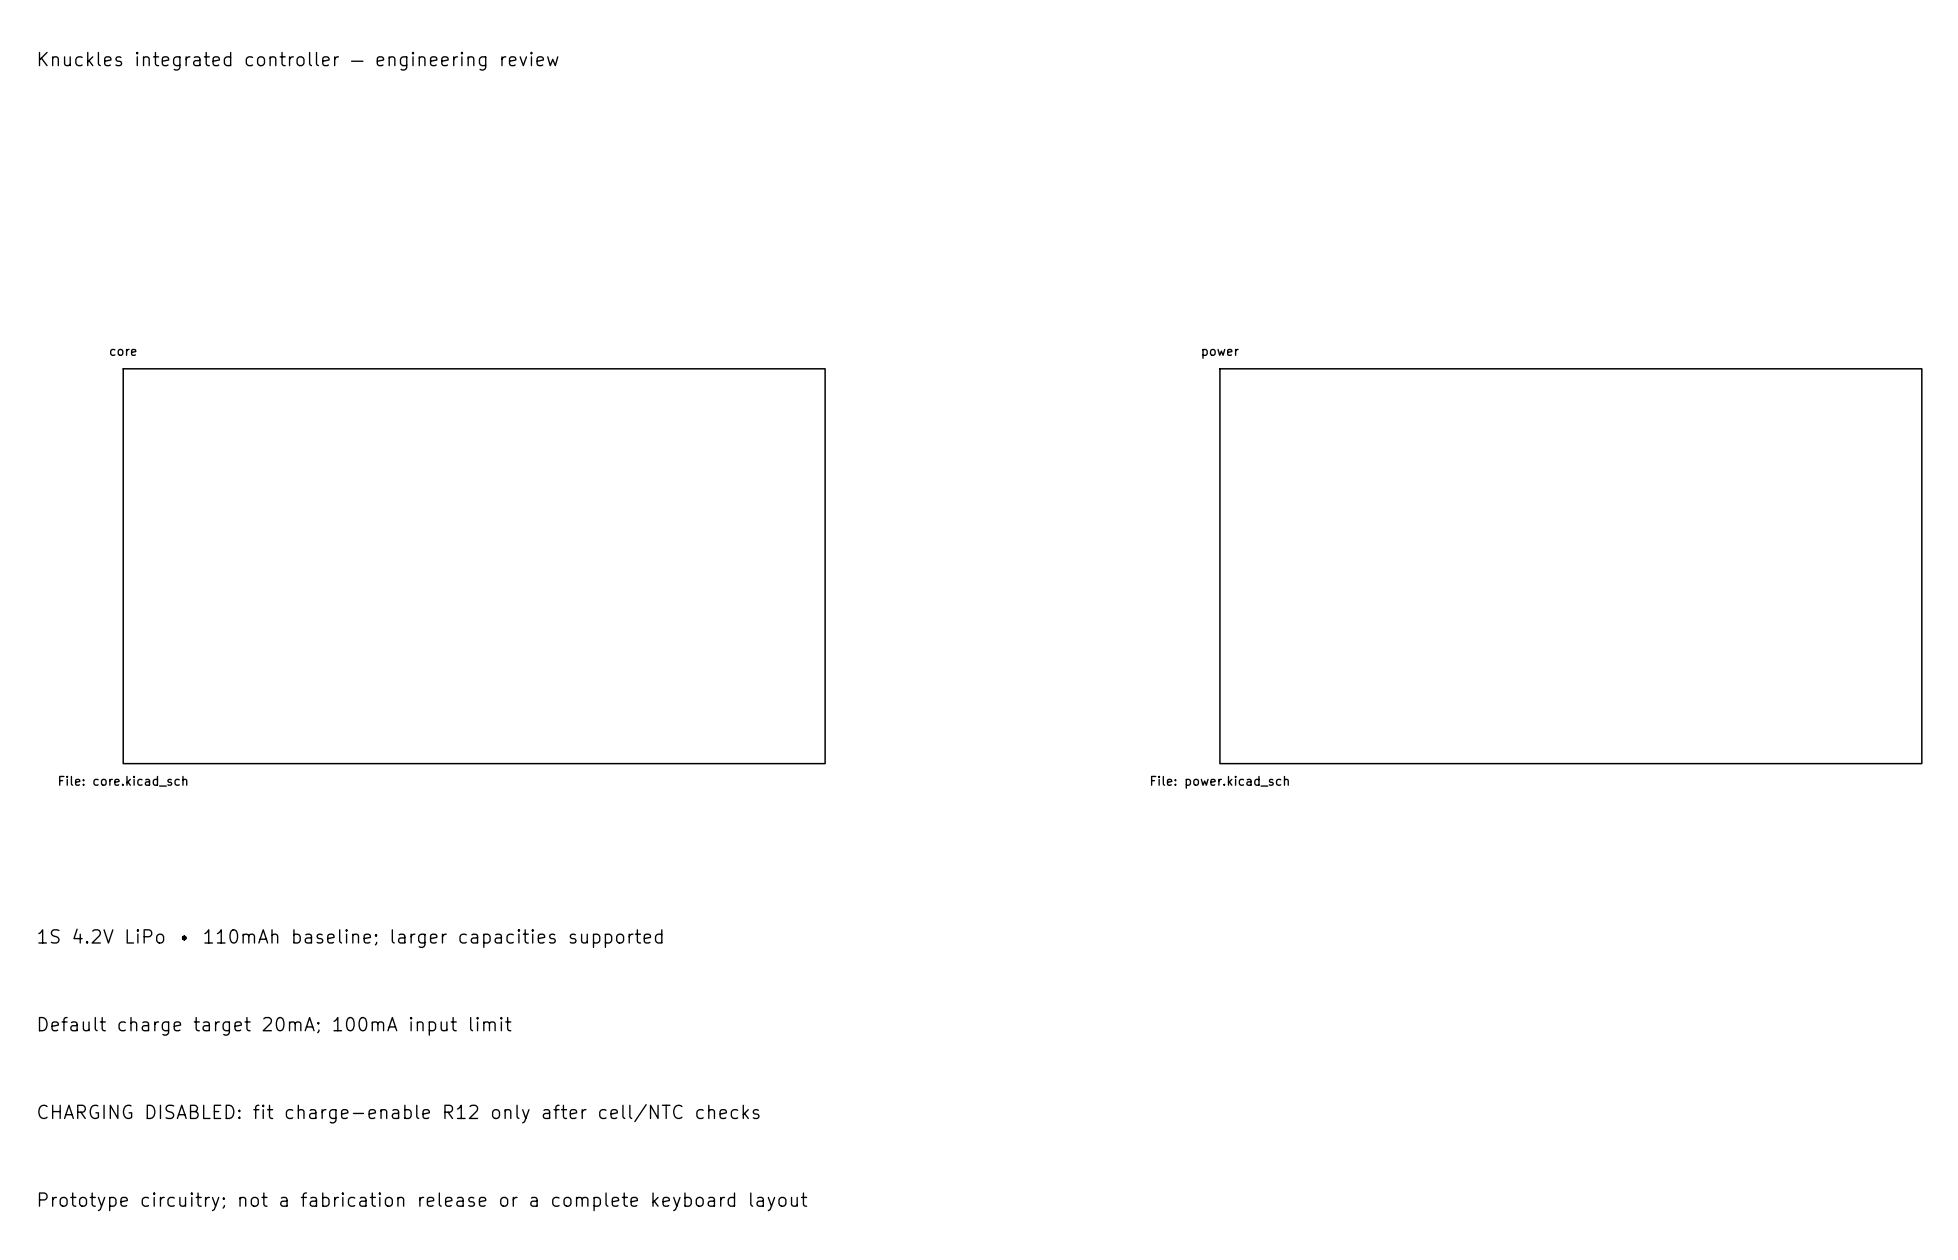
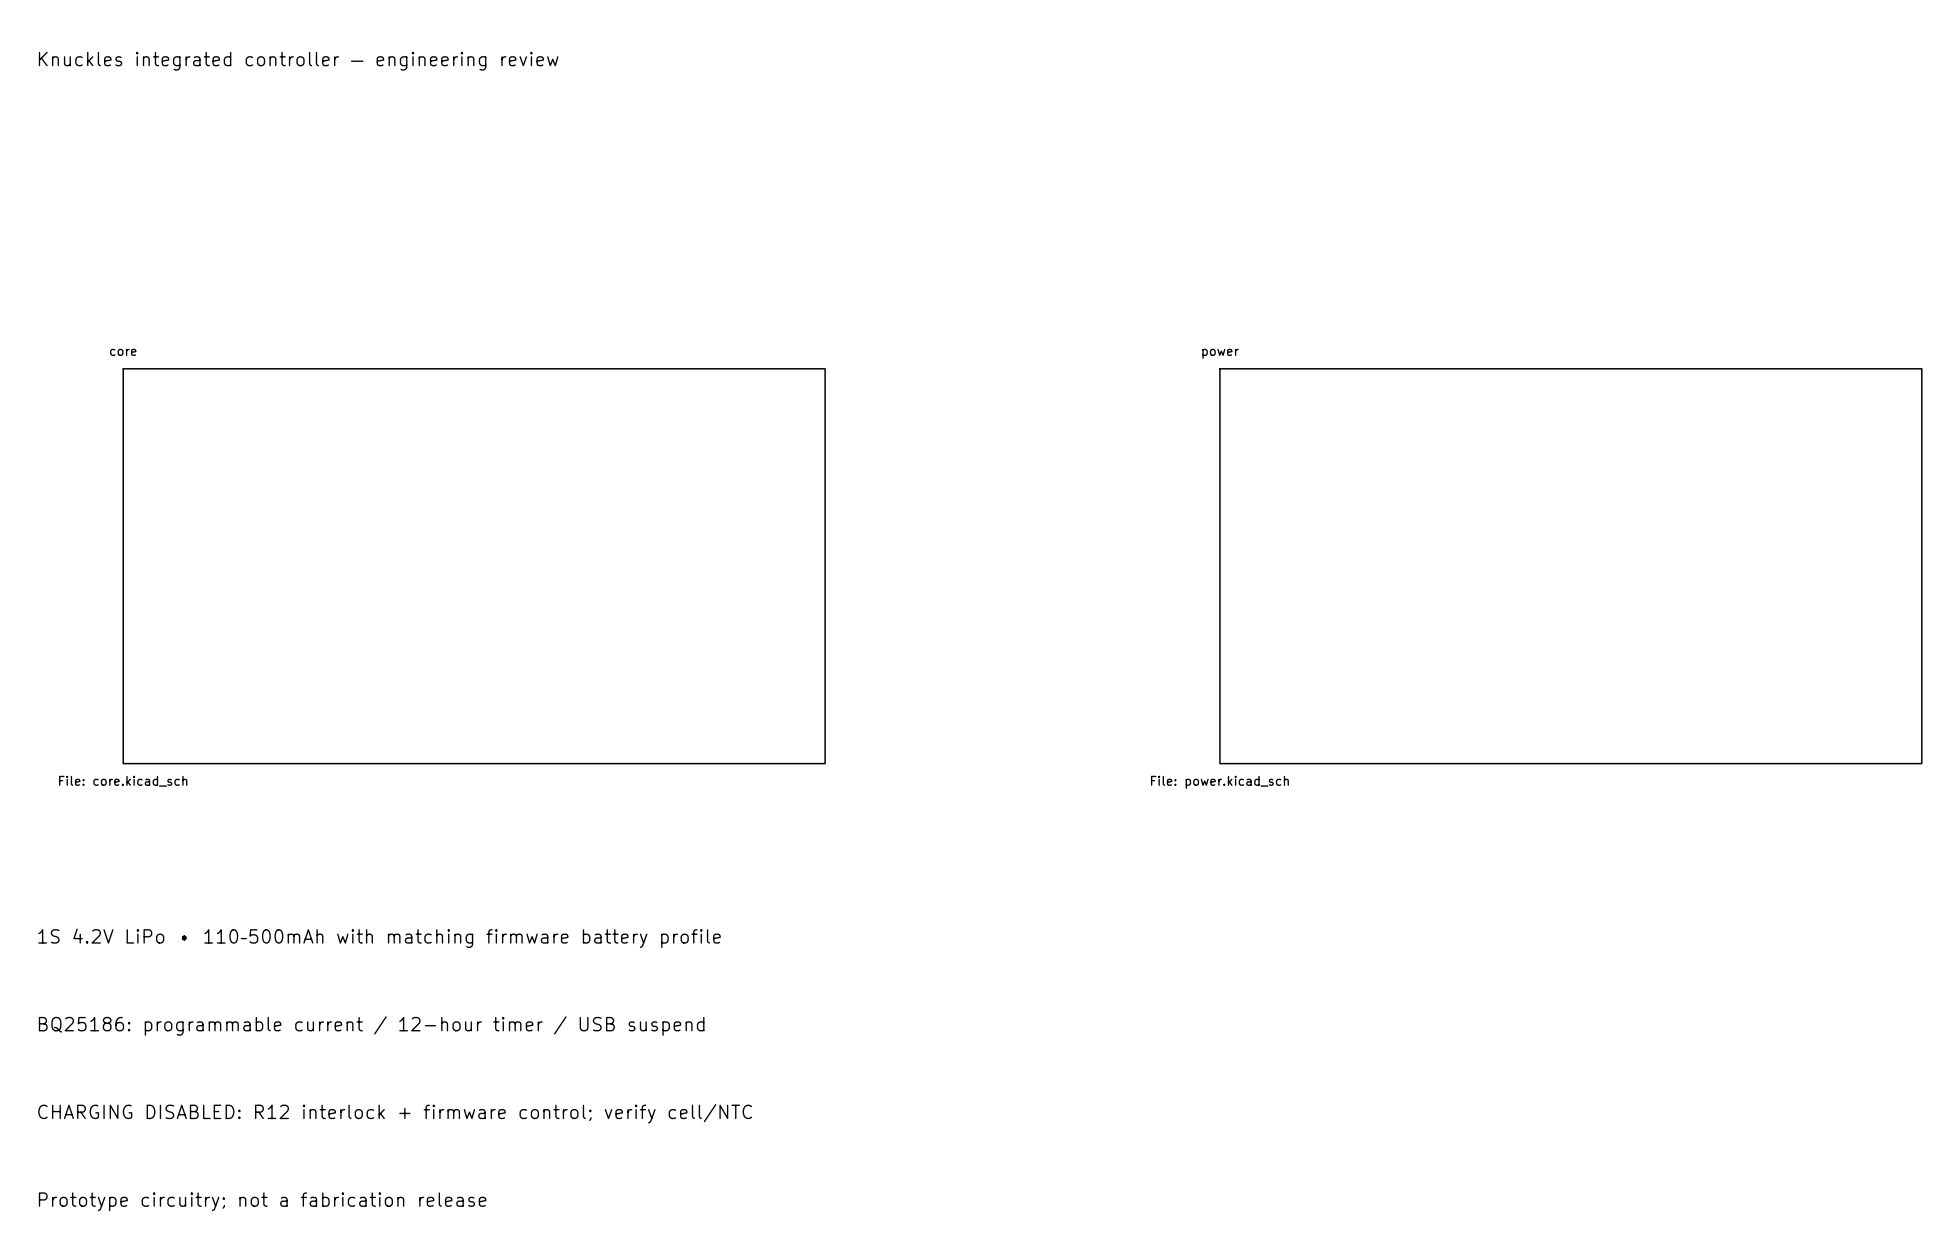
text: 1S 4.2V LiPo • 110mAh baseline; larger capacities supported (350, 938) -> 1S 4.2V LiPo • 110–500mAh with matching firmware battery profile (379, 938)
text: Default charge target 20mA; 100mA input limit (275, 1026) -> BQ25186: programmable current / 12-hour timer / USB suspend (371, 1026)
text: CHARGING DISABLED: fit charge-enable R12 only after cell/NTC checks (398, 1113) -> CHARGING DISABLED: R12 interlock + firmware control; verify cell/NTC (395, 1113)
text: Prototype circuitry; not a fabrication release or a complete keyboard layout (423, 1201) -> Prototype circuitry; not a fabrication release (262, 1201)

